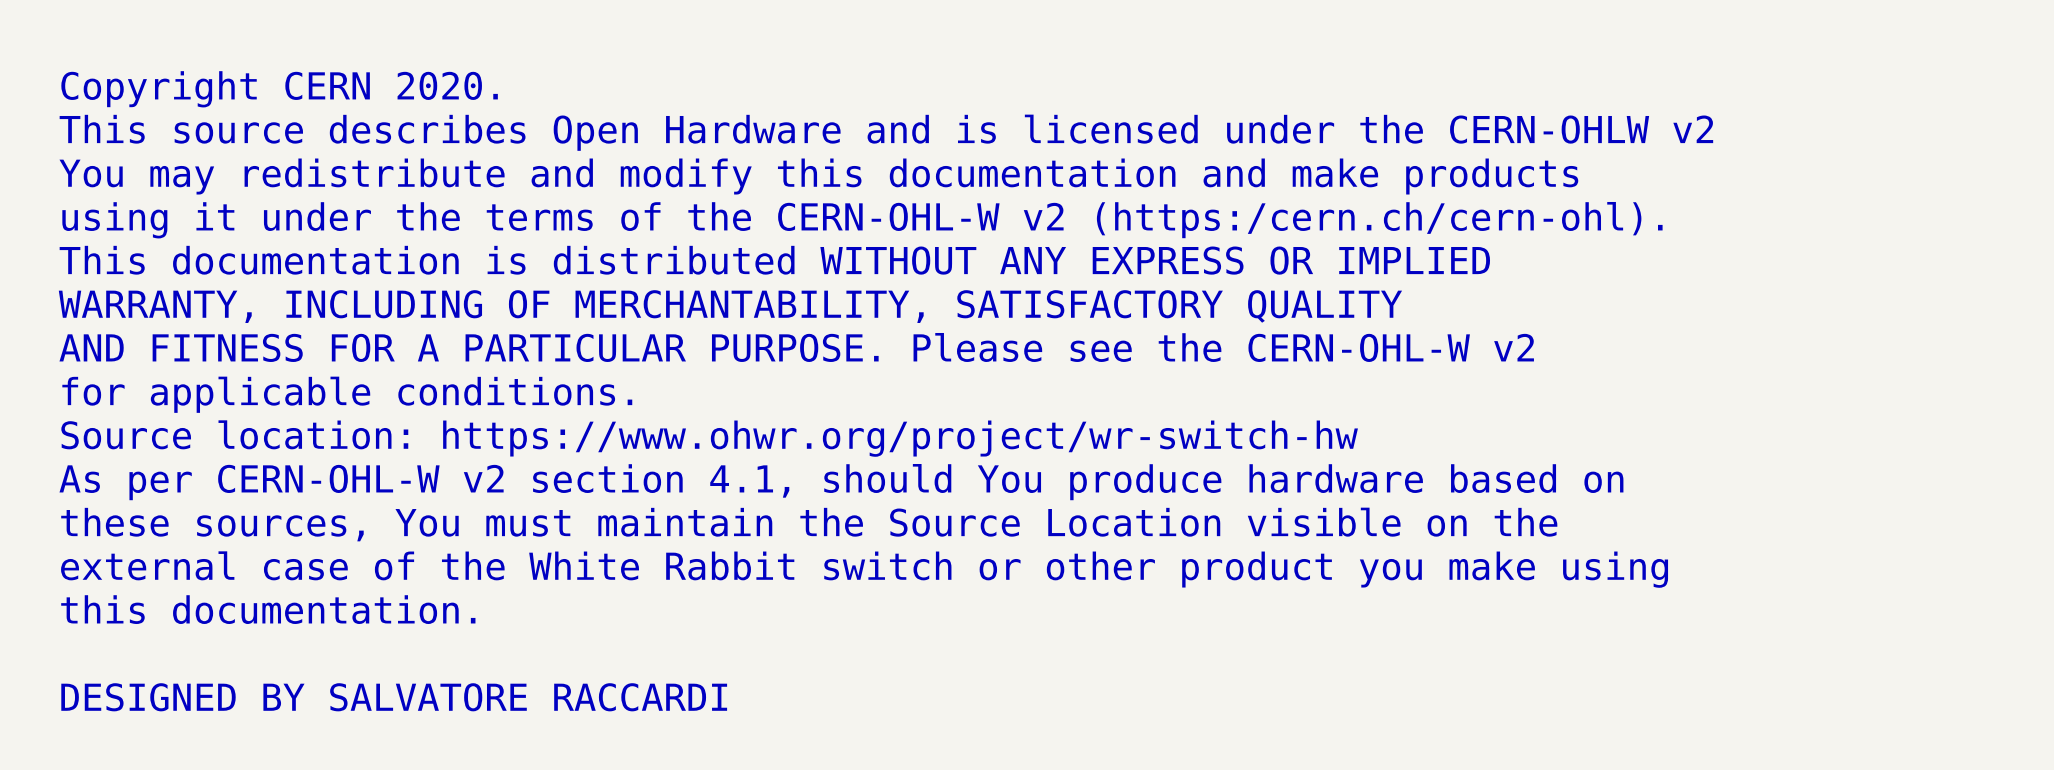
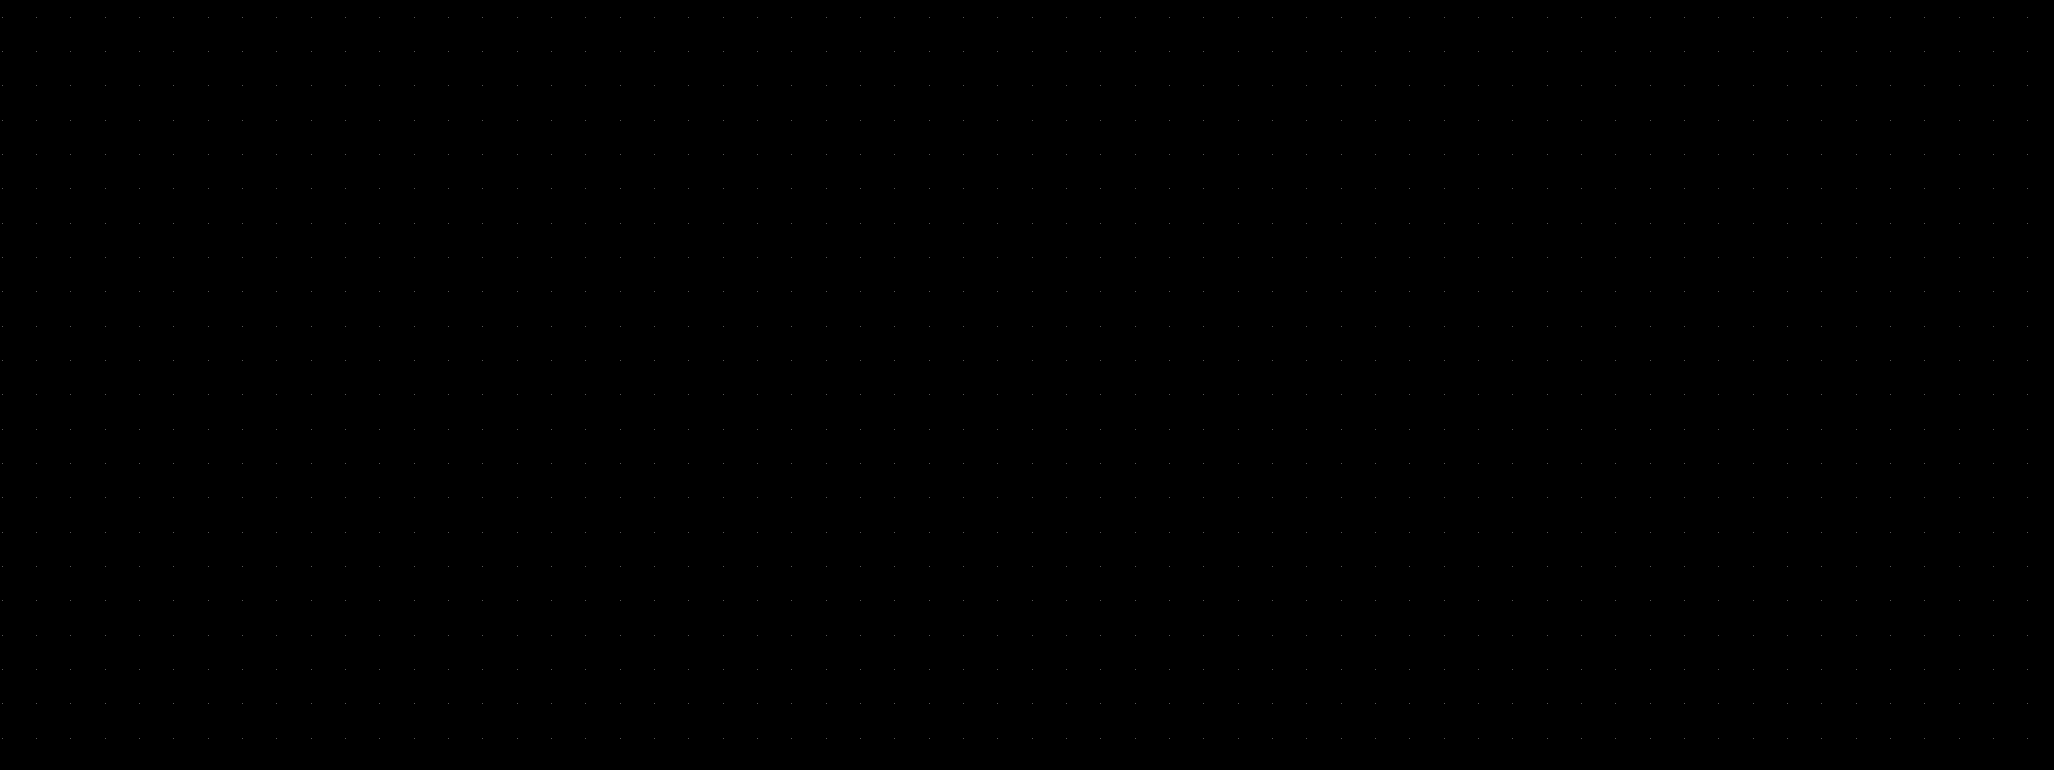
text: Copyright CERN 2020. (279, 89) -> none
text: This source describes Open Hardware and is licensed under the CERN-OHLW v2 (886, 132) -> none
text: You may redistribute and modify this documentation and make products (818, 176) -> none
text: using it under the terms of the CERN-OHL-W v2 (https:/cern.ch/cern-ohl). (862, 220) -> none
text: This documentation is distributed WITHOUT ANY EXPRESS OR IMPLIED (774, 260) -> none
text: WARRANTY, INCLUDING OF MERCHANTABILITY, SATISFACTORY QUALITY (730, 306) -> none
text: AND FITNESS FOR A PARTICULAR PURPOSE. Please see the CERN-OHL-W v2 (796, 347) -> none
text: for applicable conditions. (347, 394) -> none
text: Source location: https://www.ohwr.org/project/wr-switch-hw (709, 438) -> none
text: As per CERN-OHL-W v2 section 4.1, should You produce hardware based on (841, 482) -> none
text: these sources, You must maintain the Source Location visible on the (809, 524) -> none
text: external case of the White Rabbit switch or other product you make using (864, 569) -> none
text: this documentation. (268, 609) -> none
text: DESIGNED BY SALVATORE RACCARDI (394, 697) -> none

